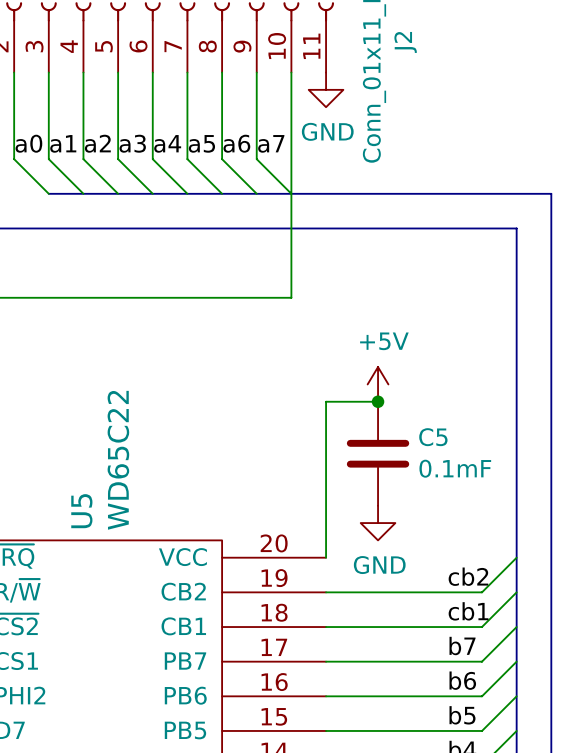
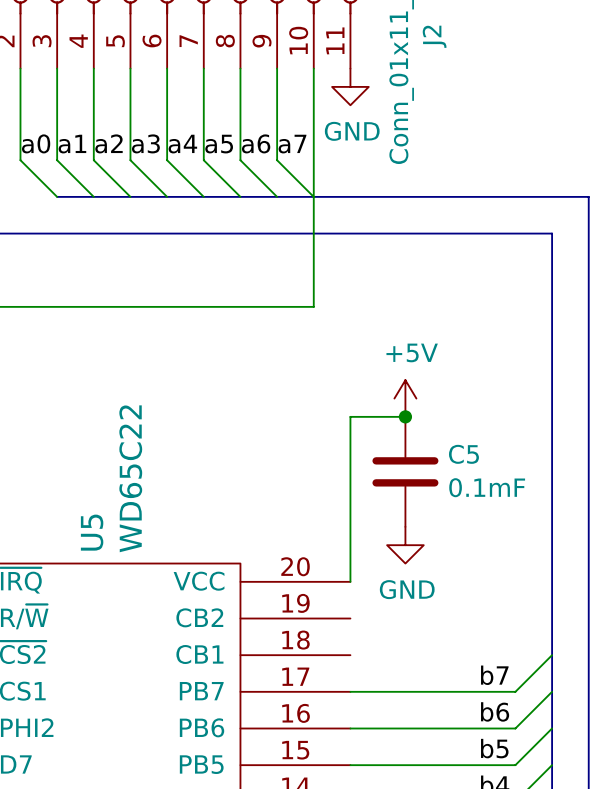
wire: (516, 557) (482, 592) (326, 592) -> none
label: cb2 (468, 576) -> none
wire: (516, 592) (482, 627) (326, 627) -> none
label: cb1 (468, 611) -> none

